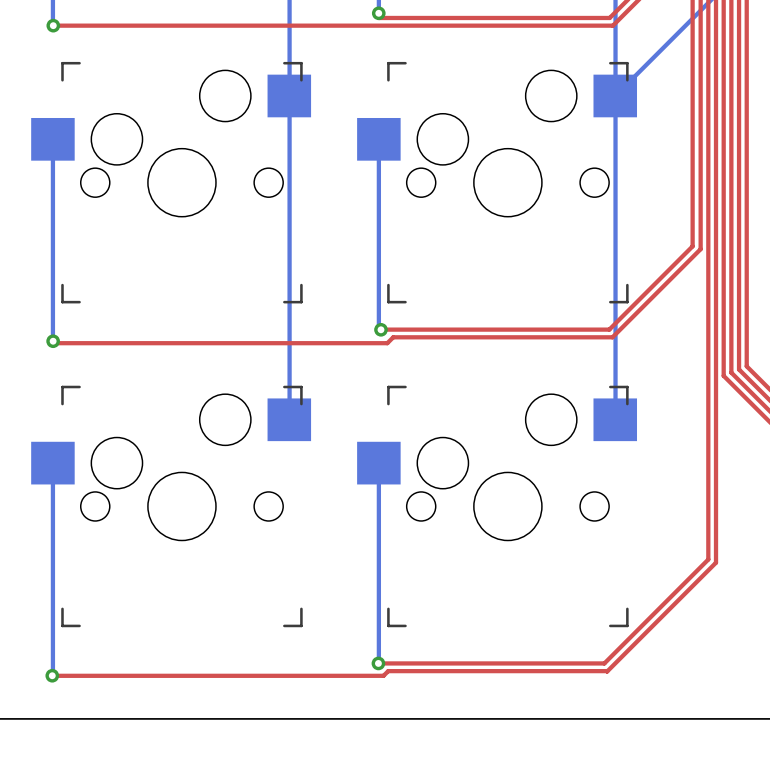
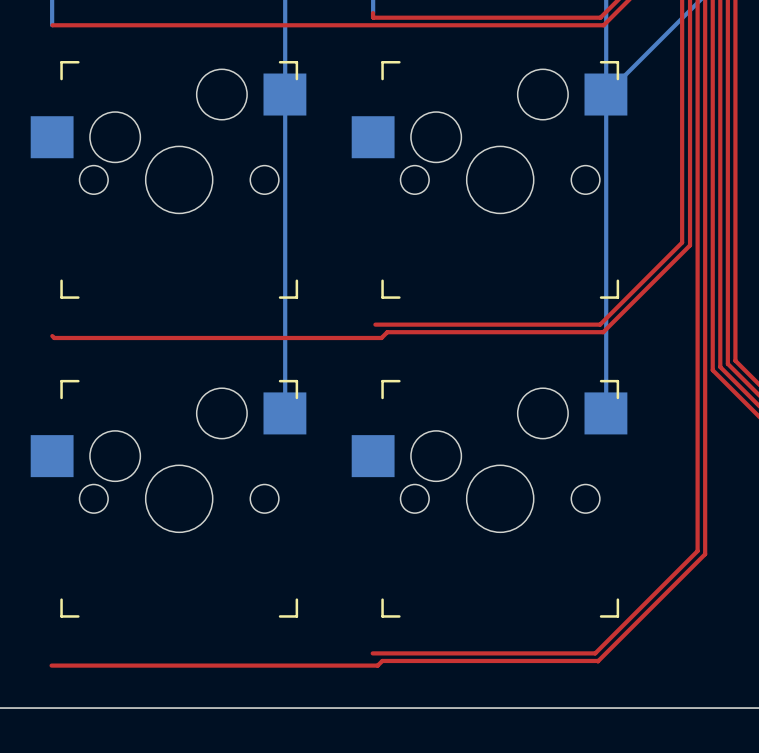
via: (378, 13) -> none
via: (53, 25) -> none
bottom track: (52, 139) (52, 341) -> none
bottom track: (378, 139) (378, 327) (380, 329) -> none
via: (380, 329) -> none
via: (53, 341) -> none
bottom track: (52, 463) (52, 675) -> none
bottom track: (378, 463) (378, 663) -> none
via: (378, 663) -> none
via: (52, 675) -> none

